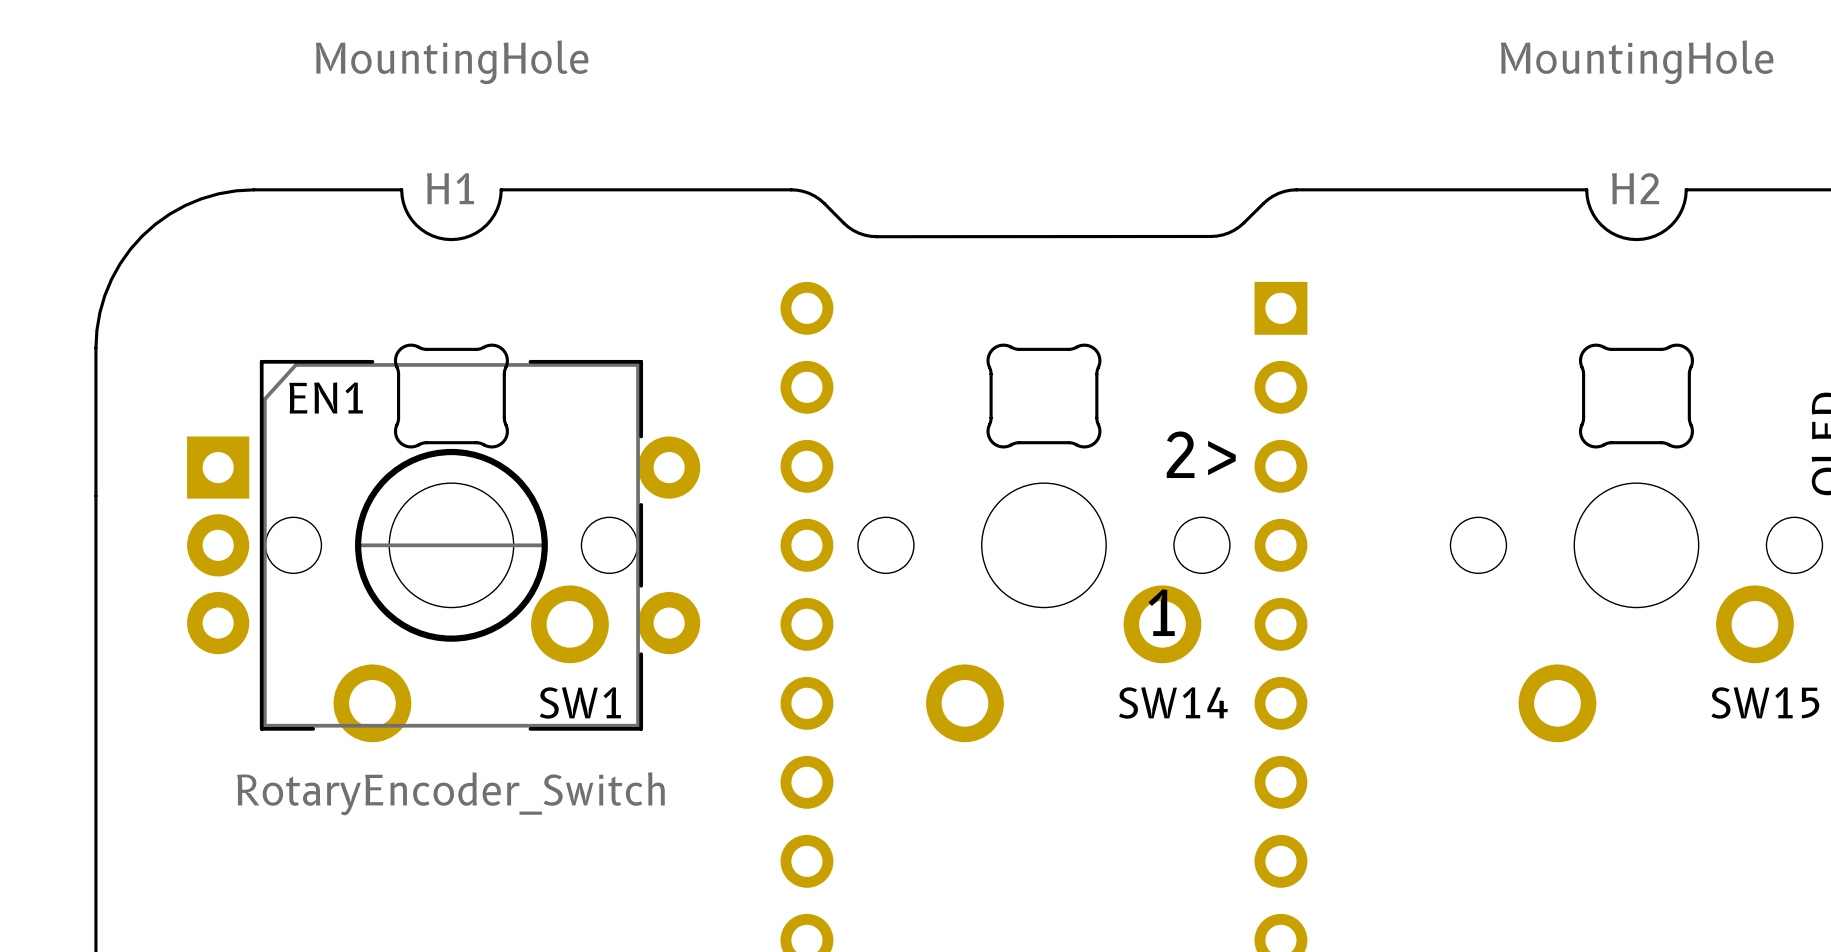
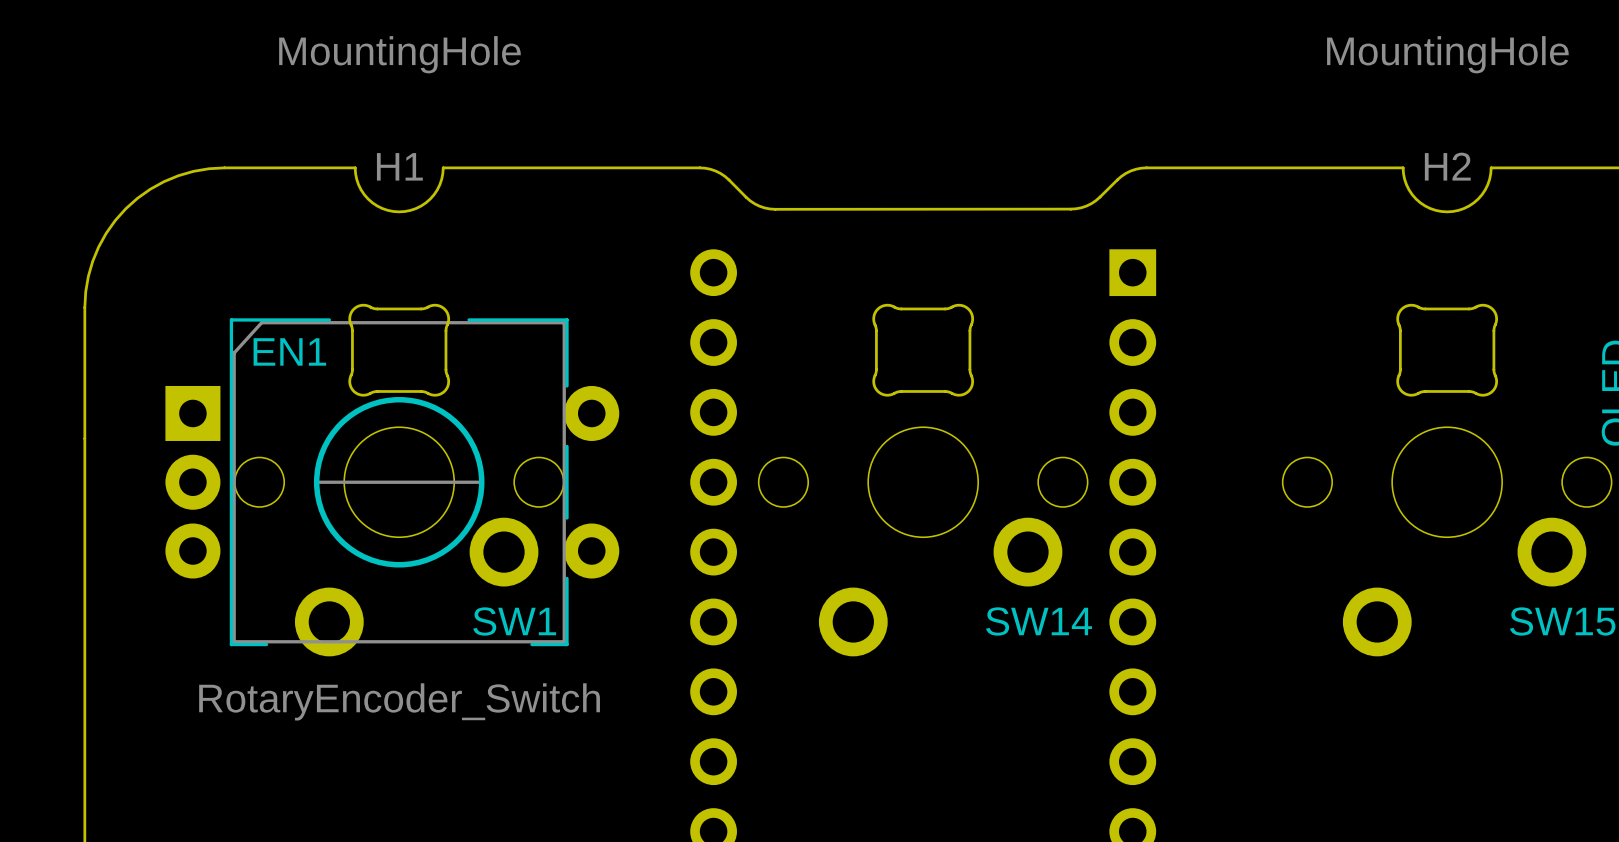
EN1 footprint: [187, 359, 701, 731] -> [165, 318, 620, 647]
text: 2> (1201, 454) -> none
text: 1 (1161, 612) -> none

